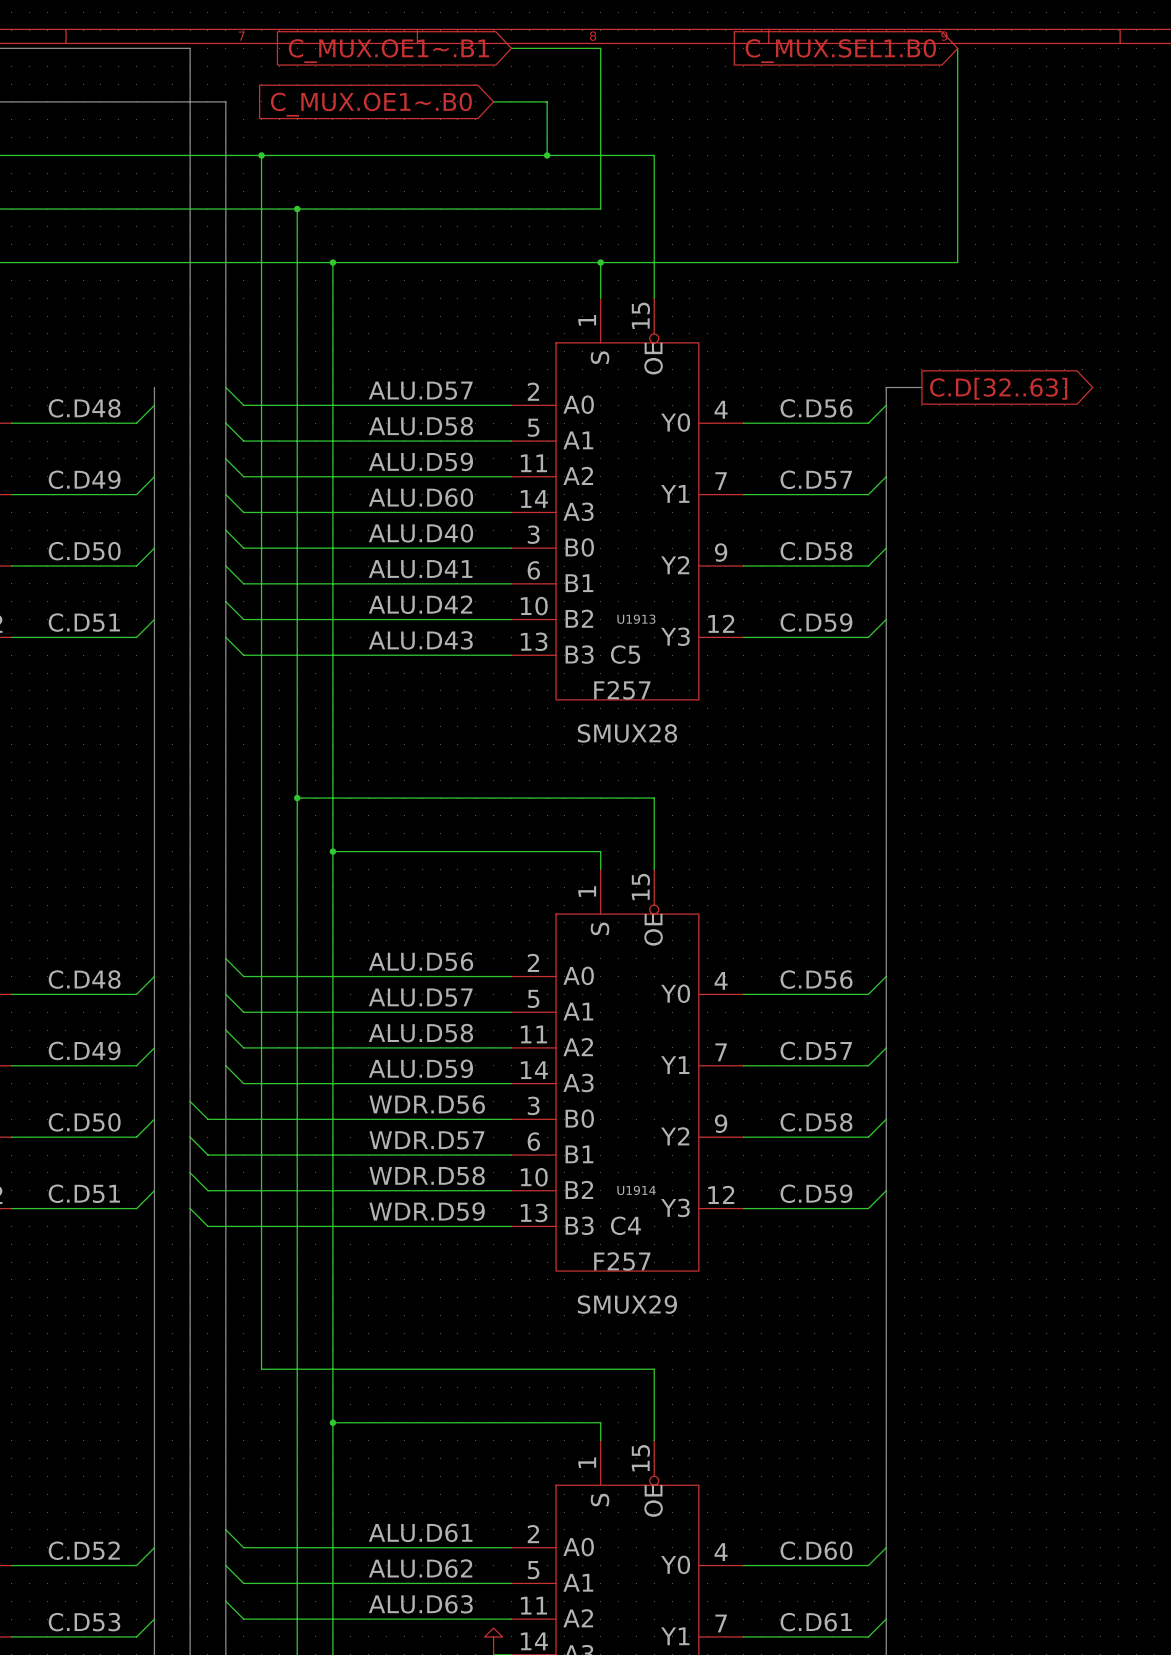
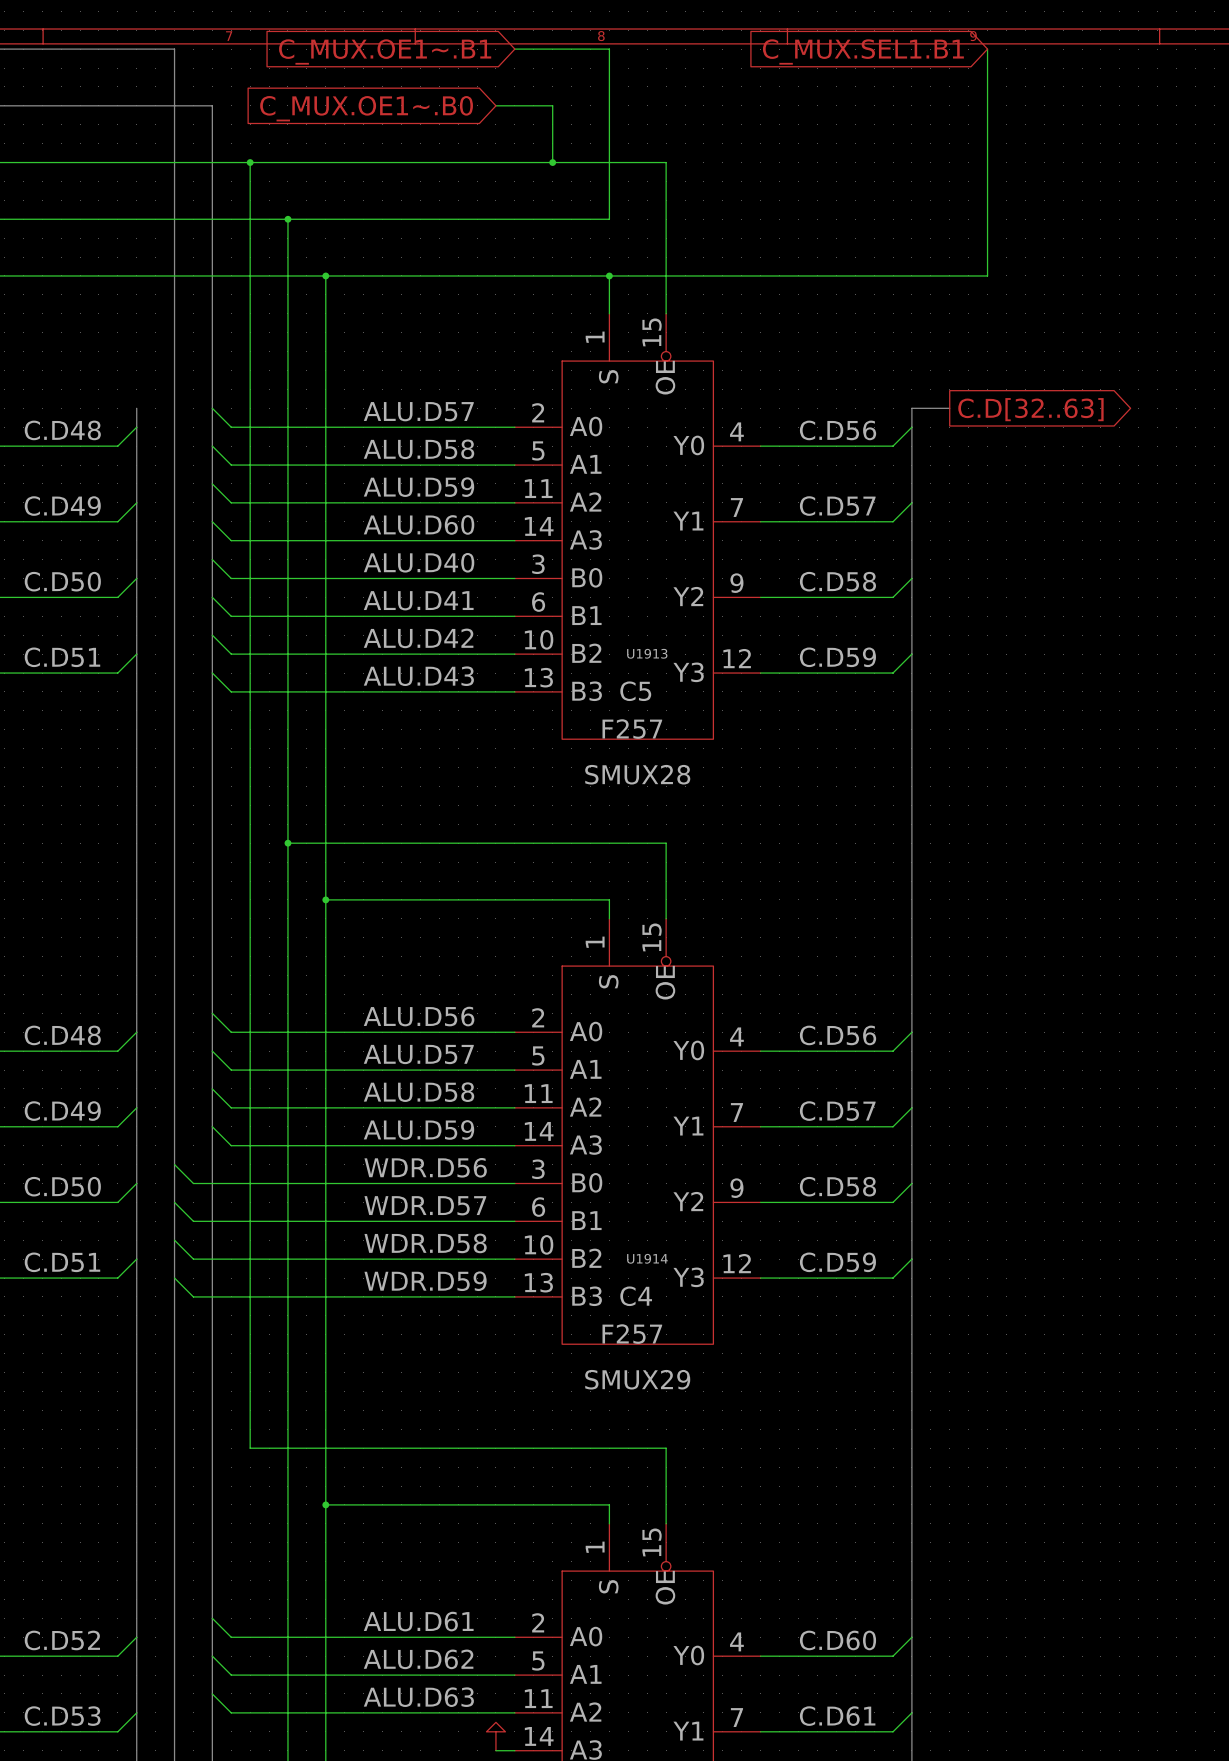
global label: C_MUX.SEL1.B0 (840, 51) -> C_MUX.SEL1.B1 (863, 51)

